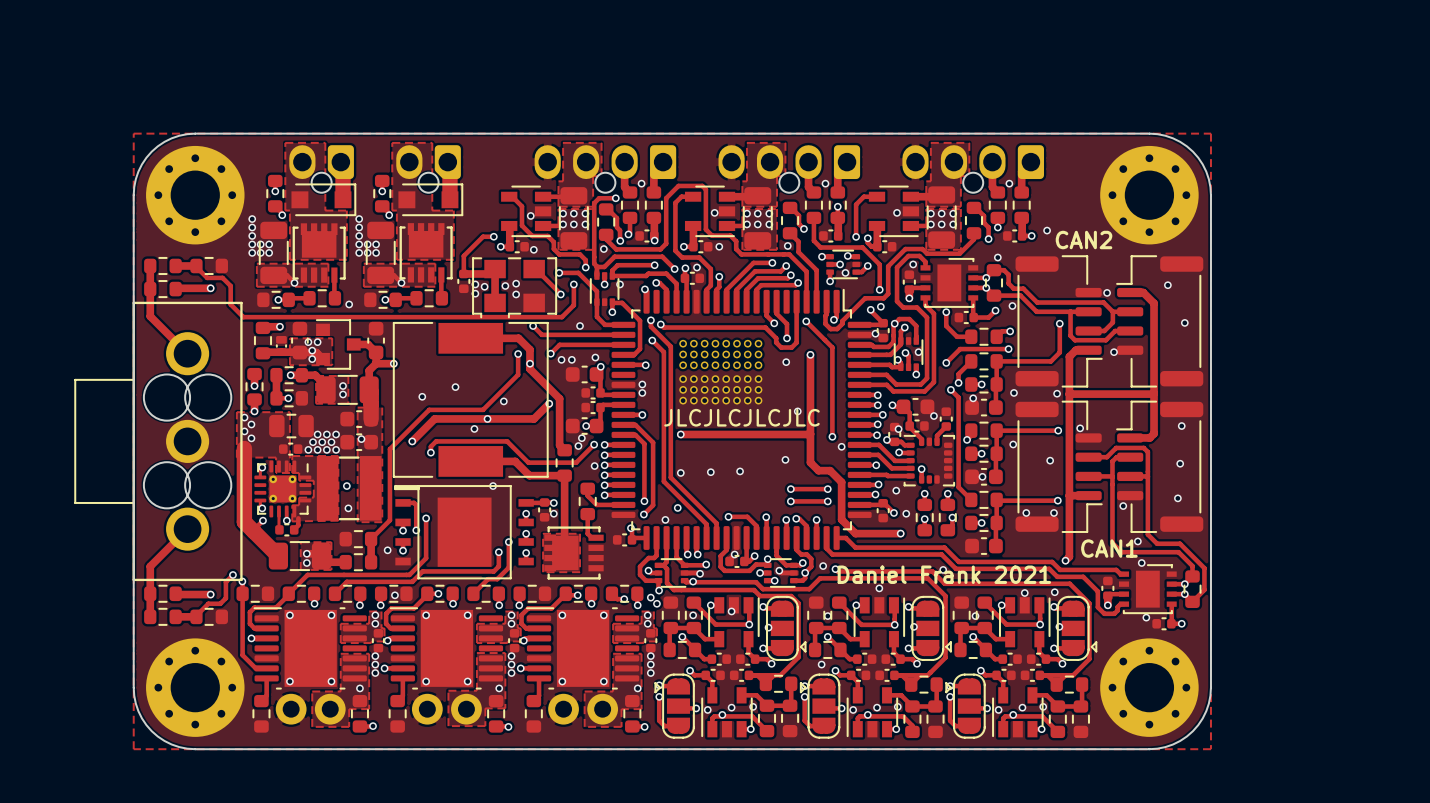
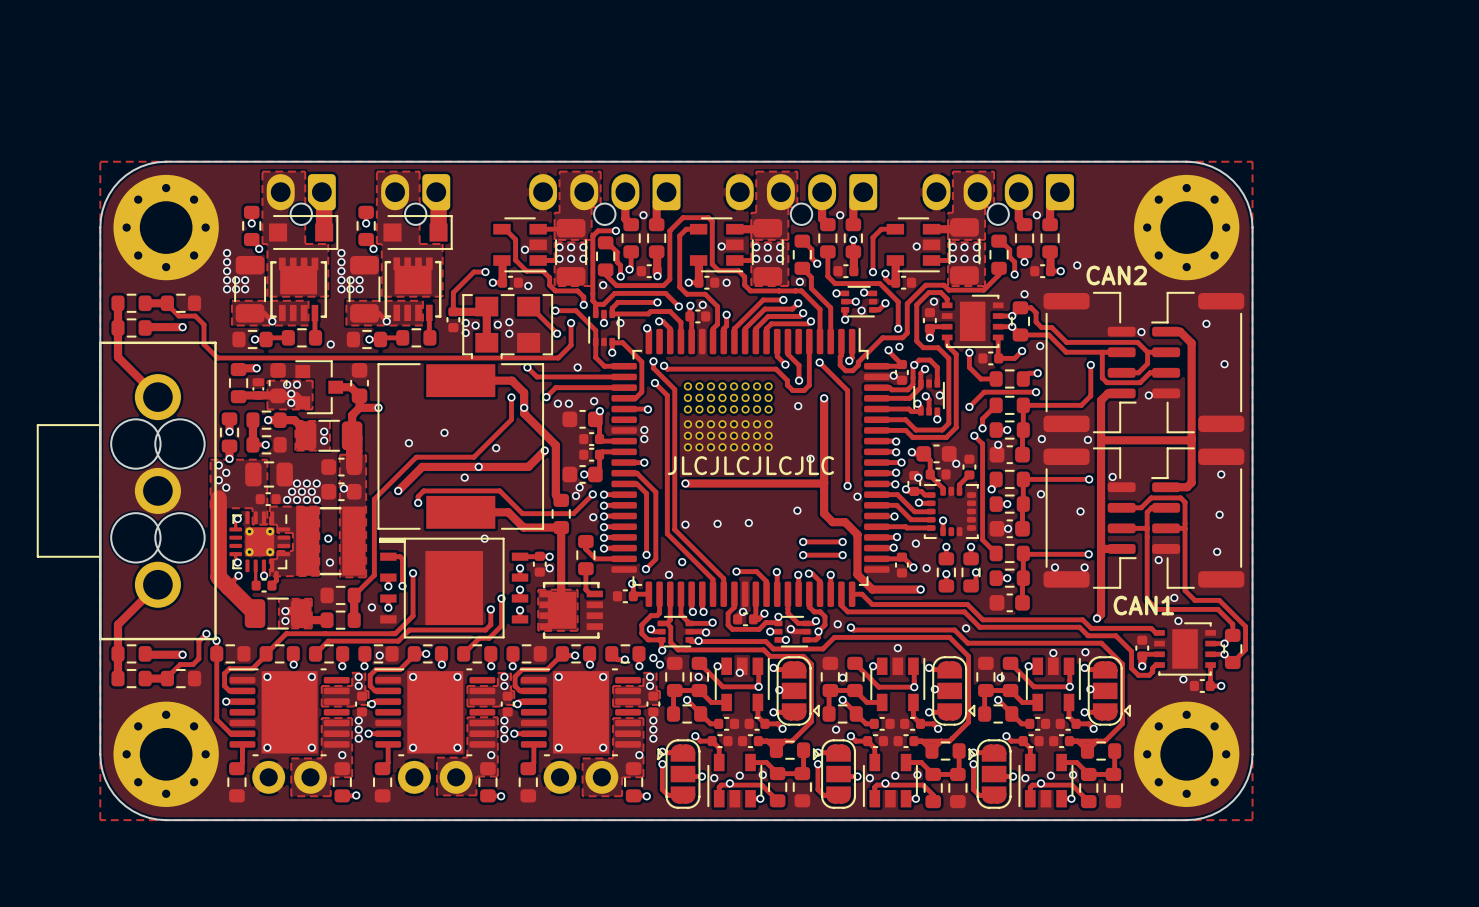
text: Daniel Frank 2021 (944, 574) -> none

